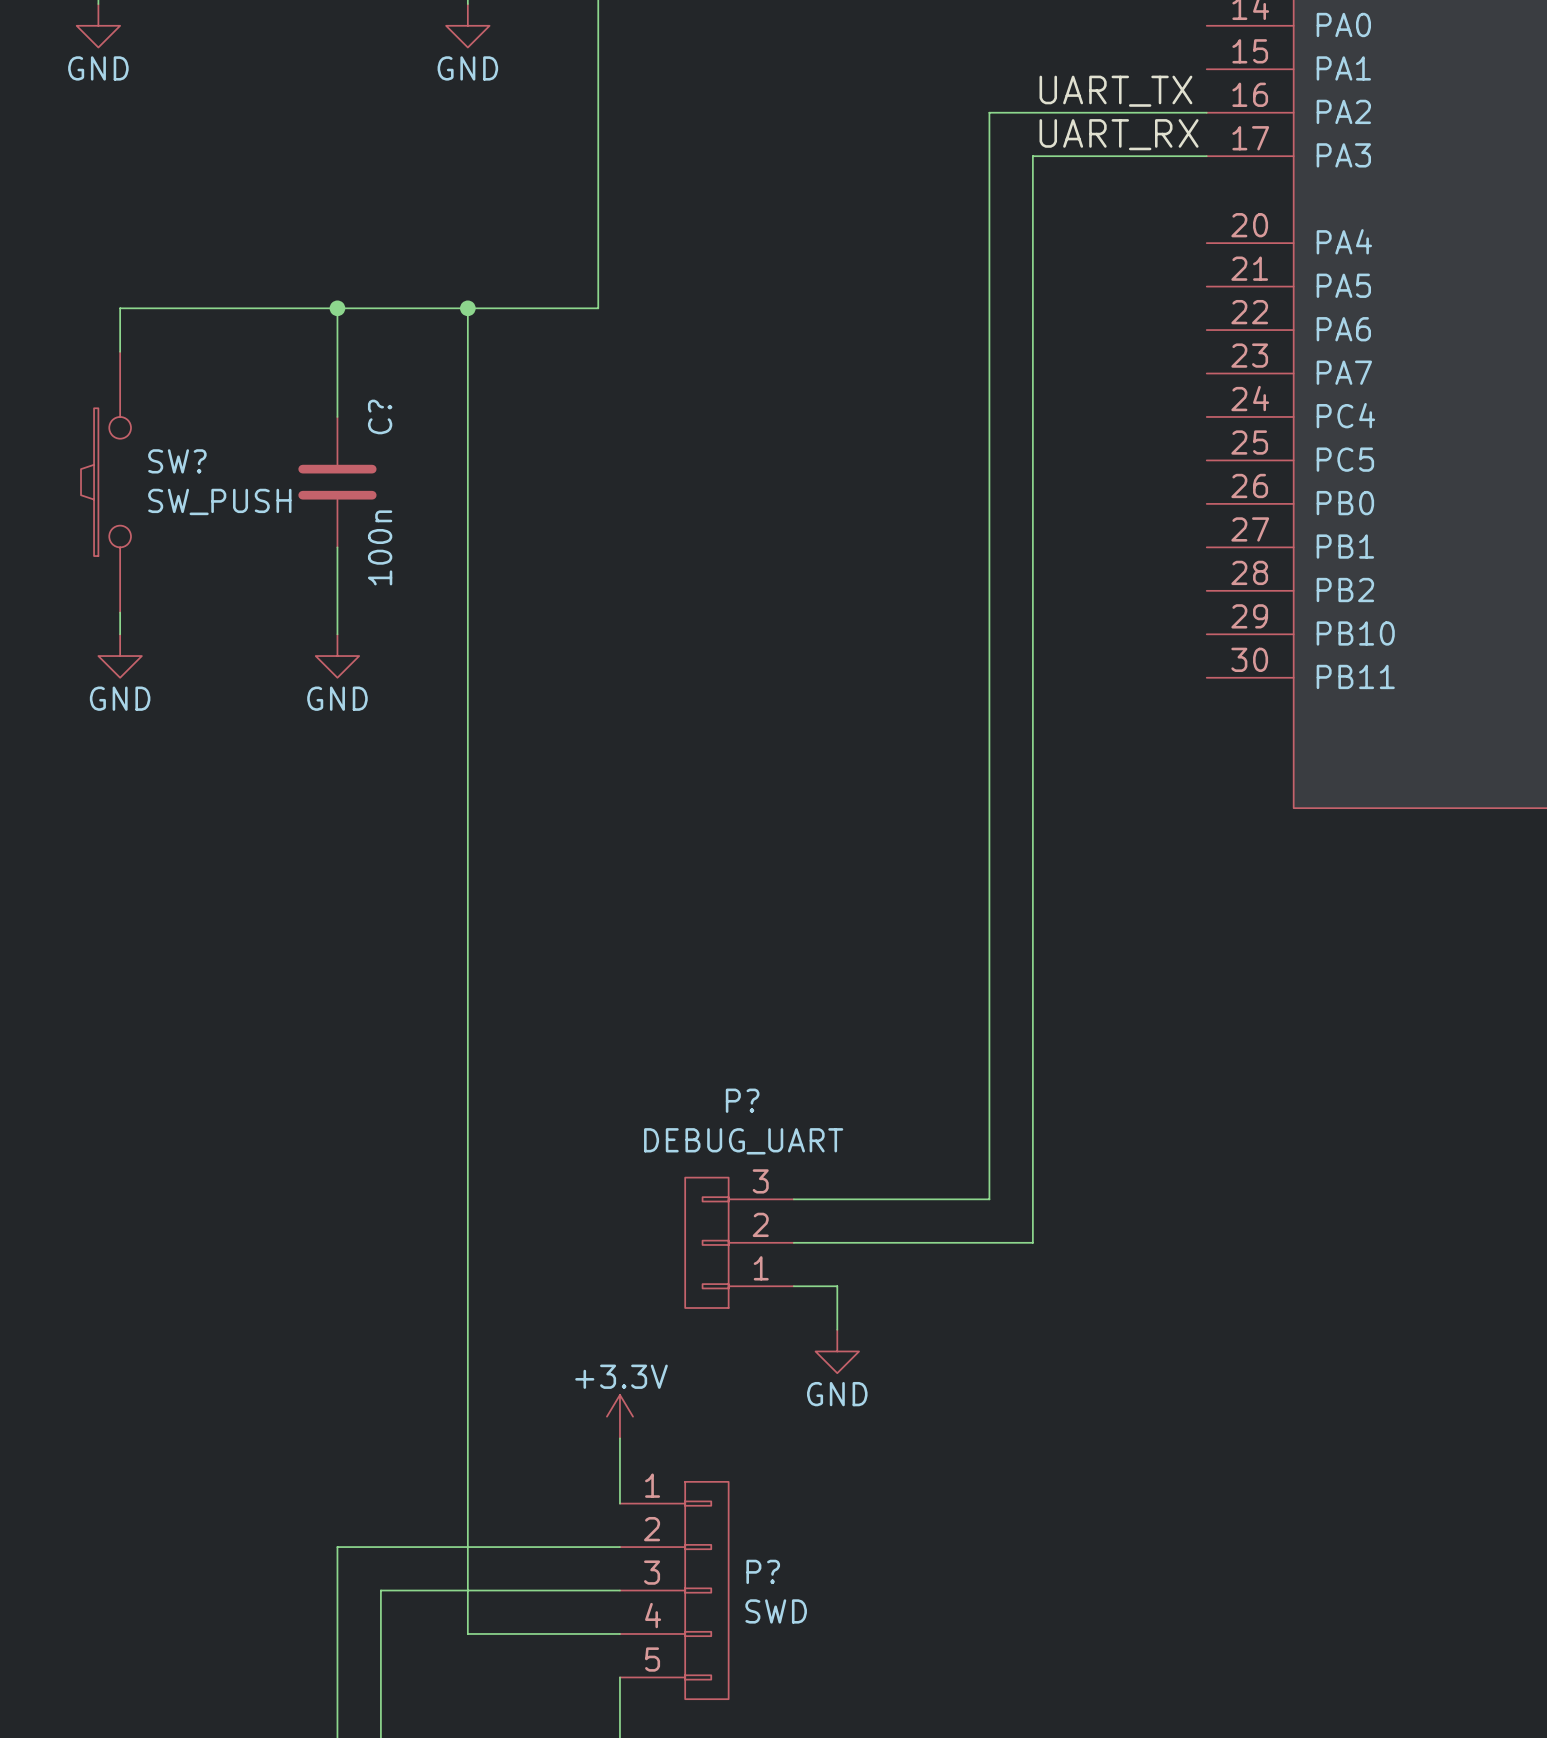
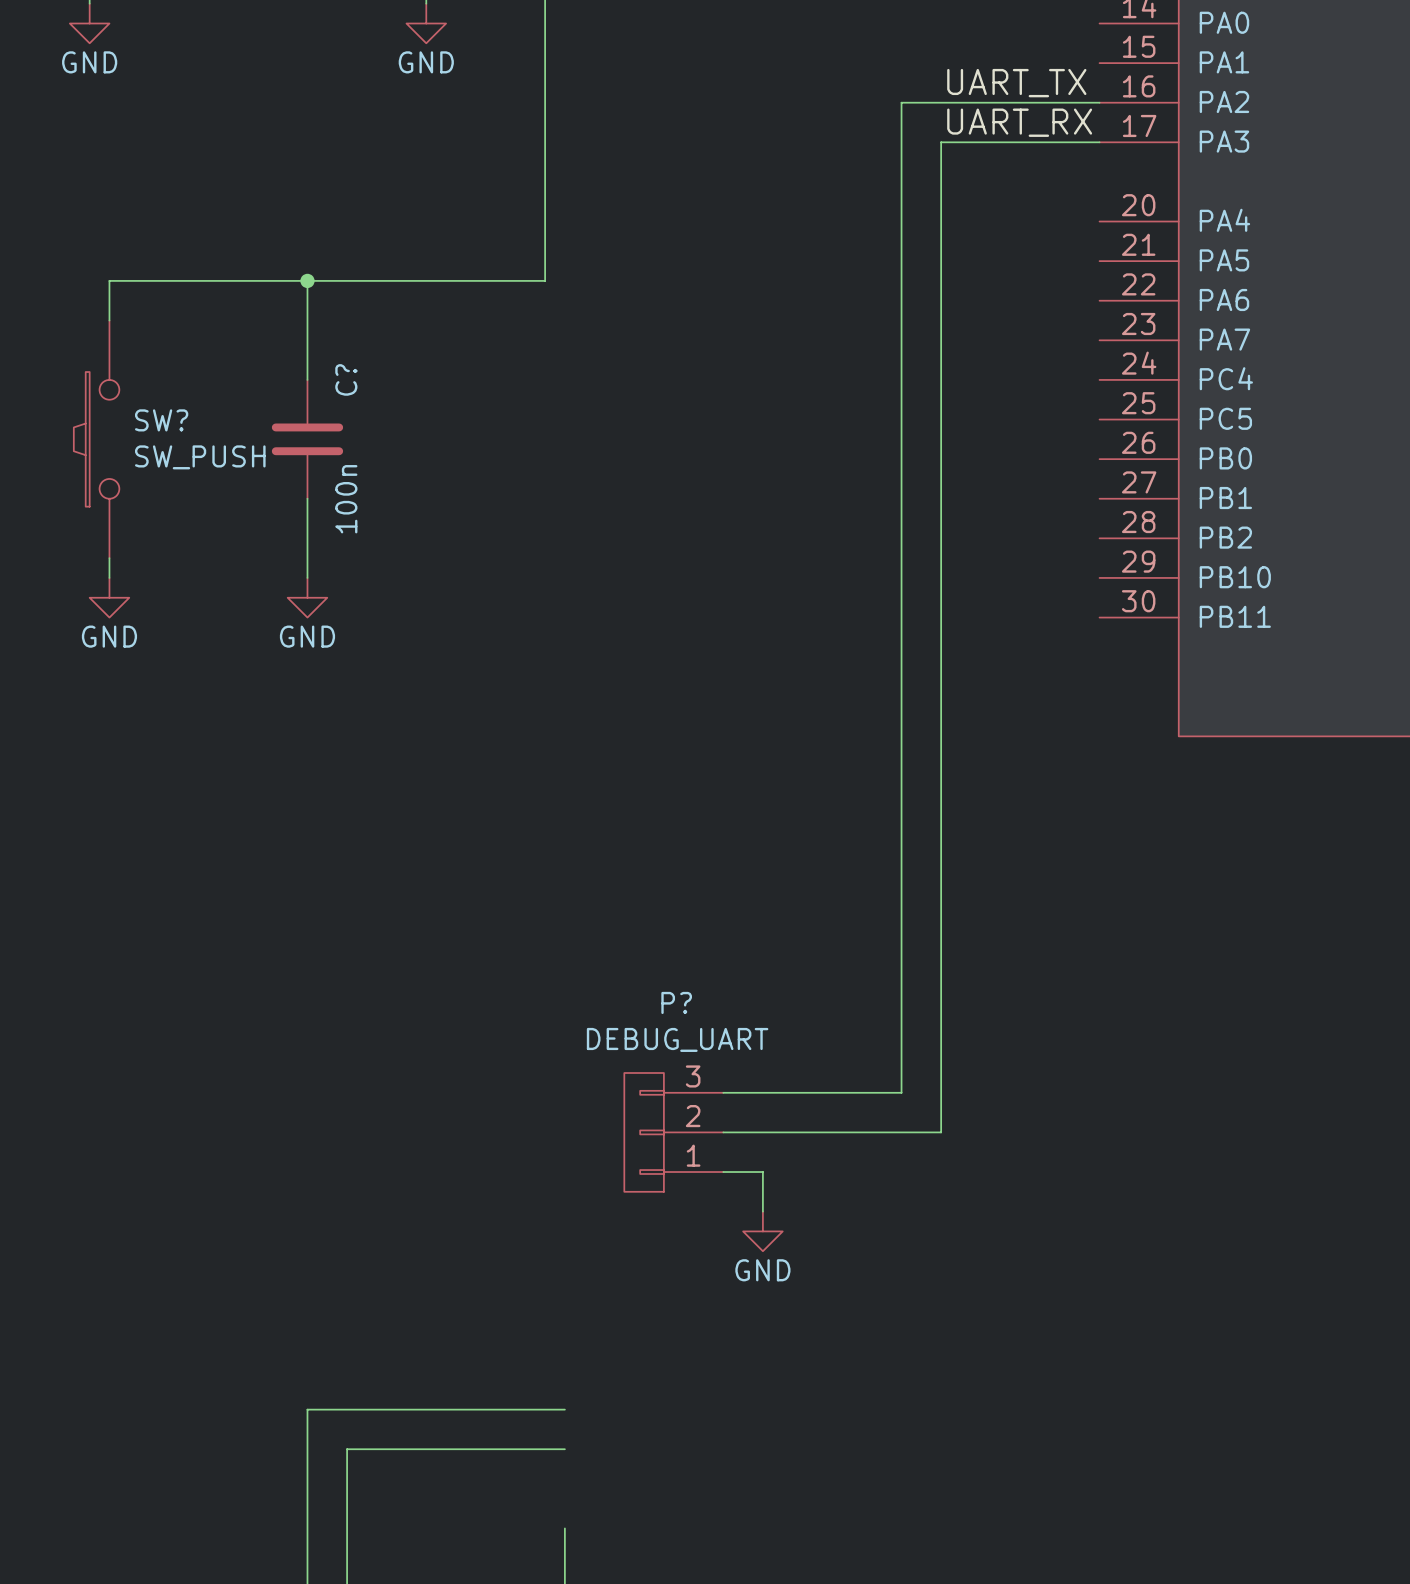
wire: (467, 308) (467, 1633) (619, 1633) -> none
junction: (467, 308) -> none
power symbol: +3.3V (619, 1416) -> none
wire: (619, 1438) (619, 1503) -> none
P?: SWD (674, 1590) -> none

